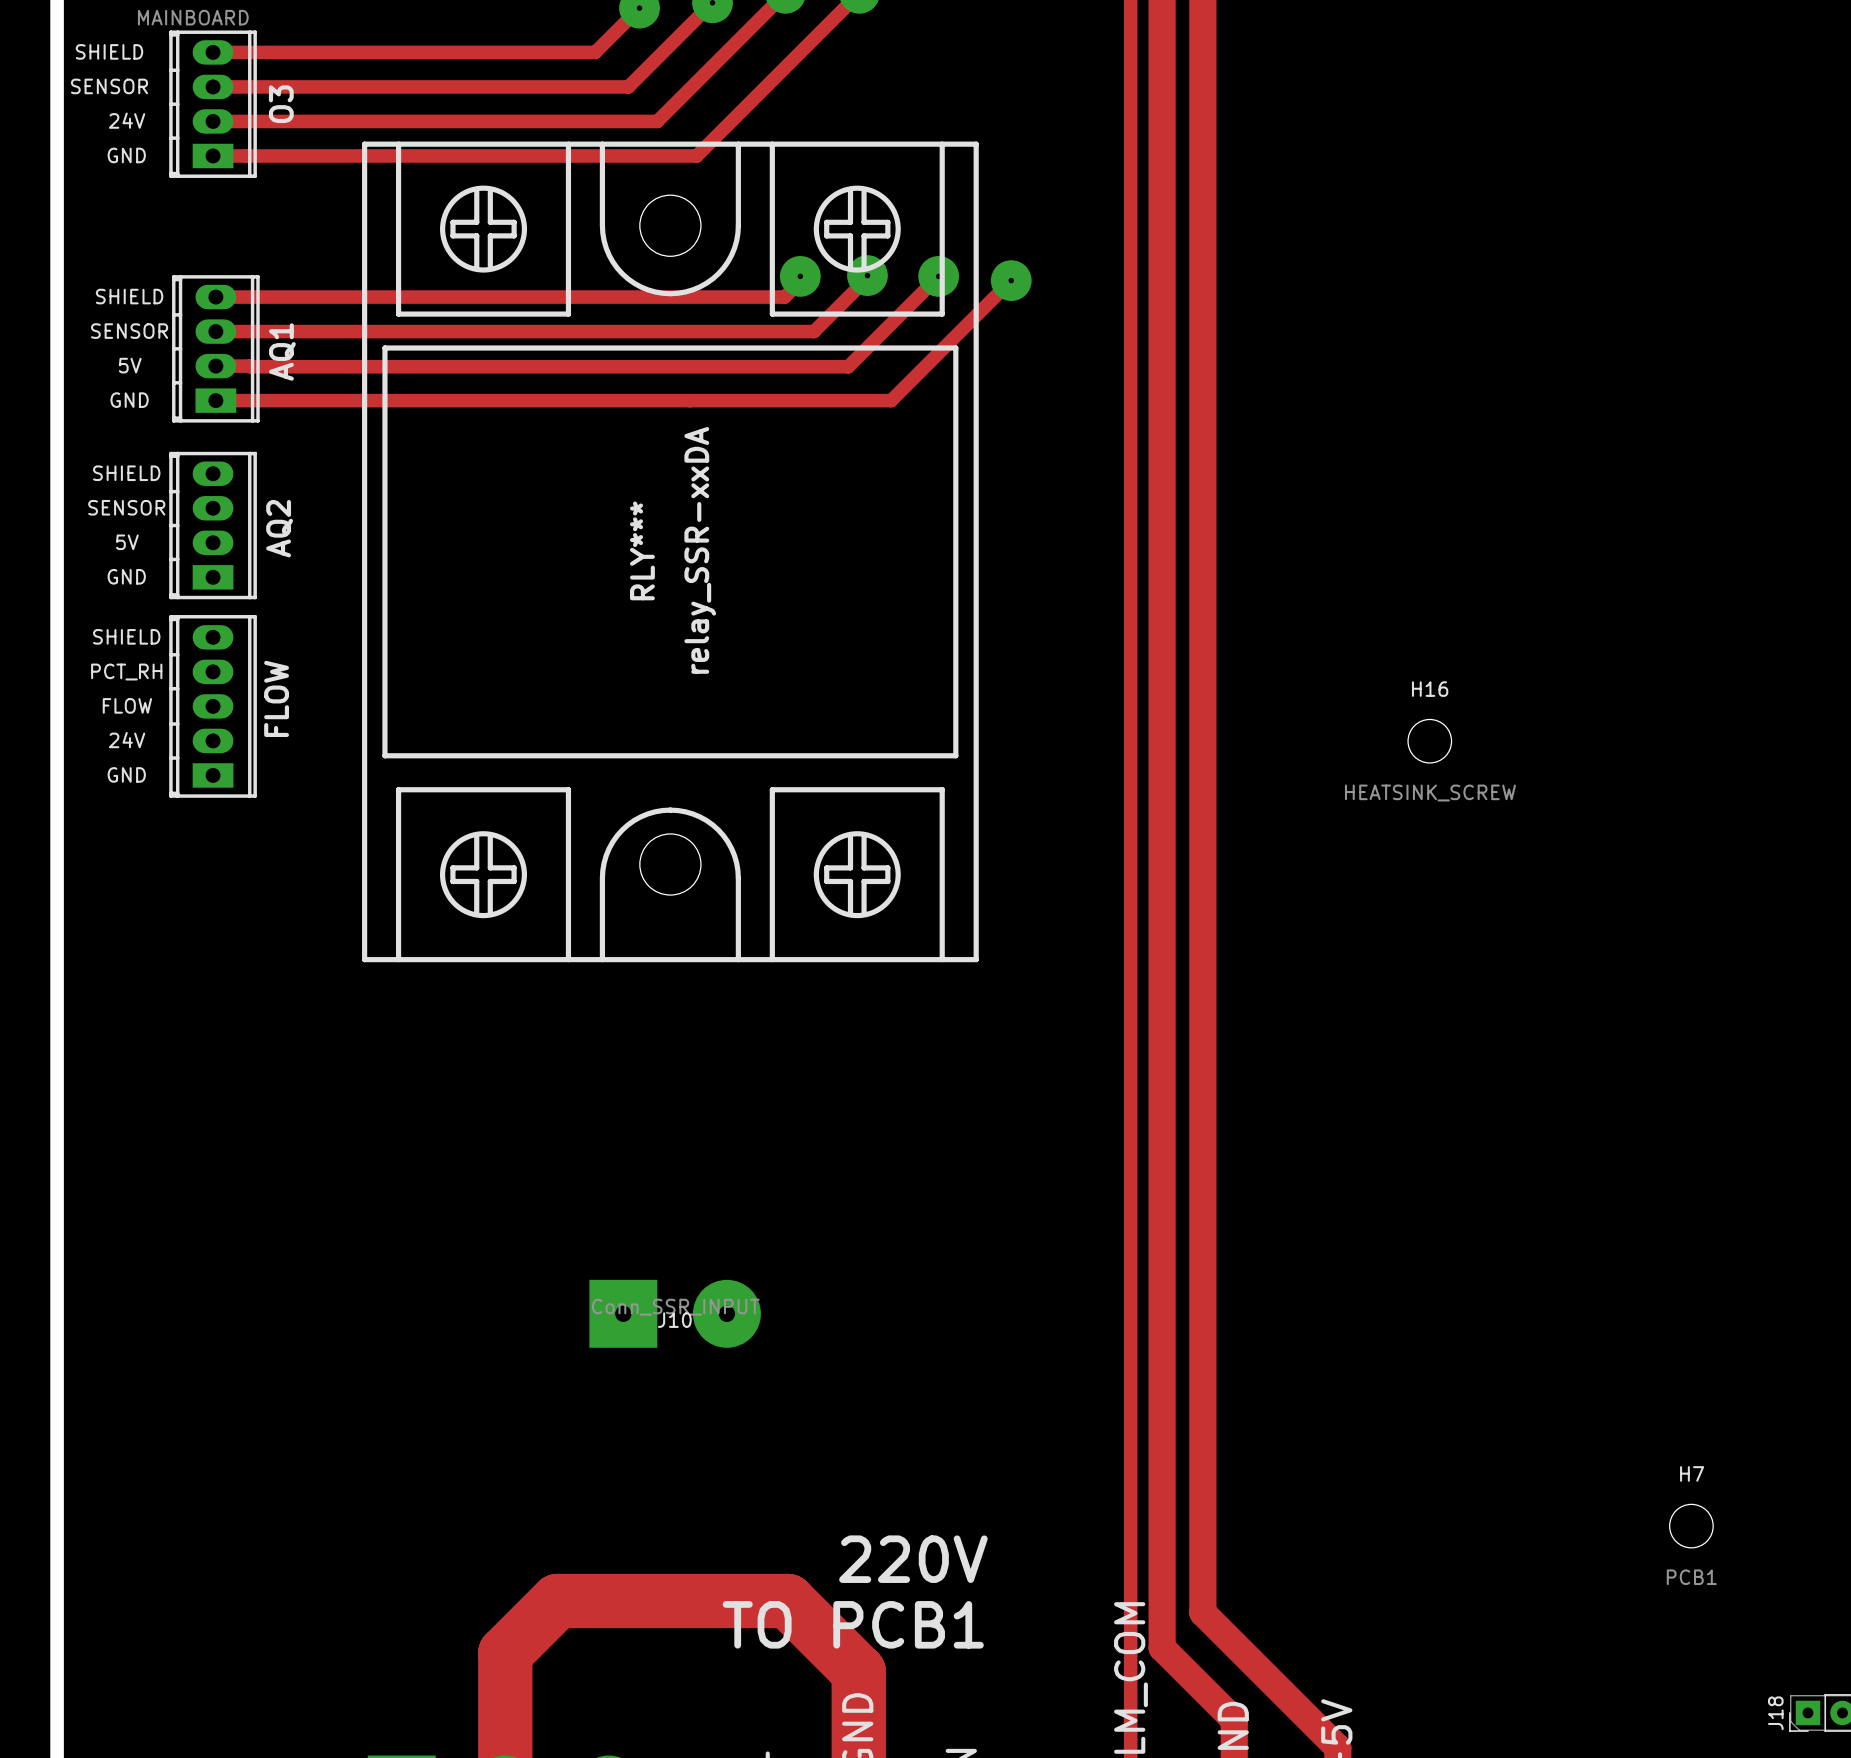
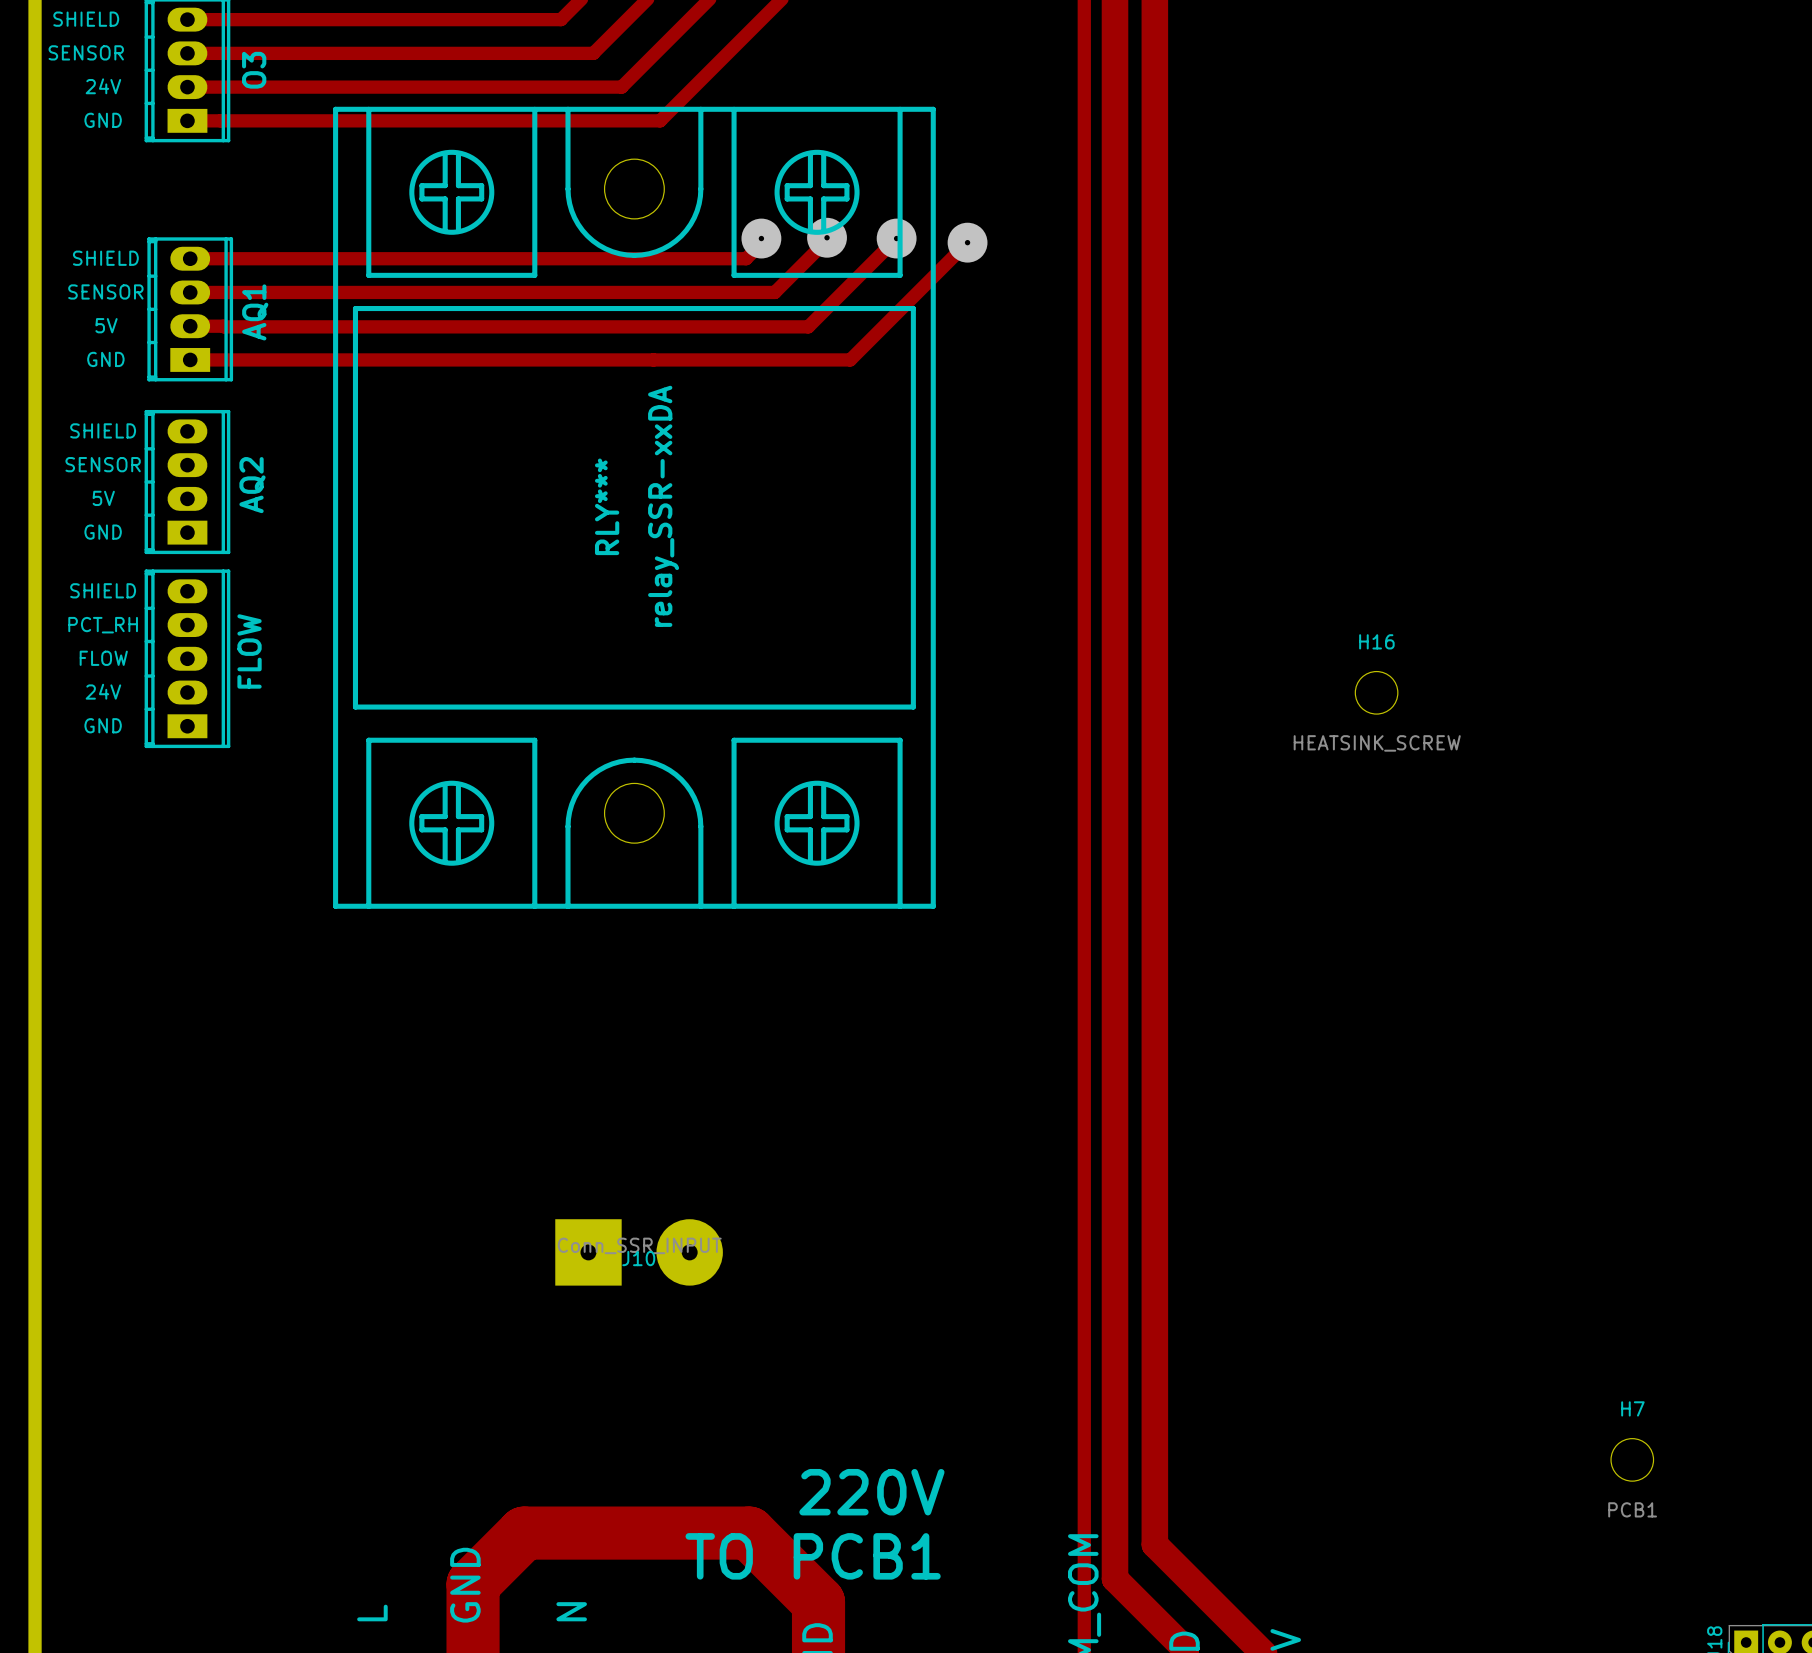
text: none -> GND (465, 1585)
text: none -> N (571, 1611)
text: none -> L (372, 1613)

